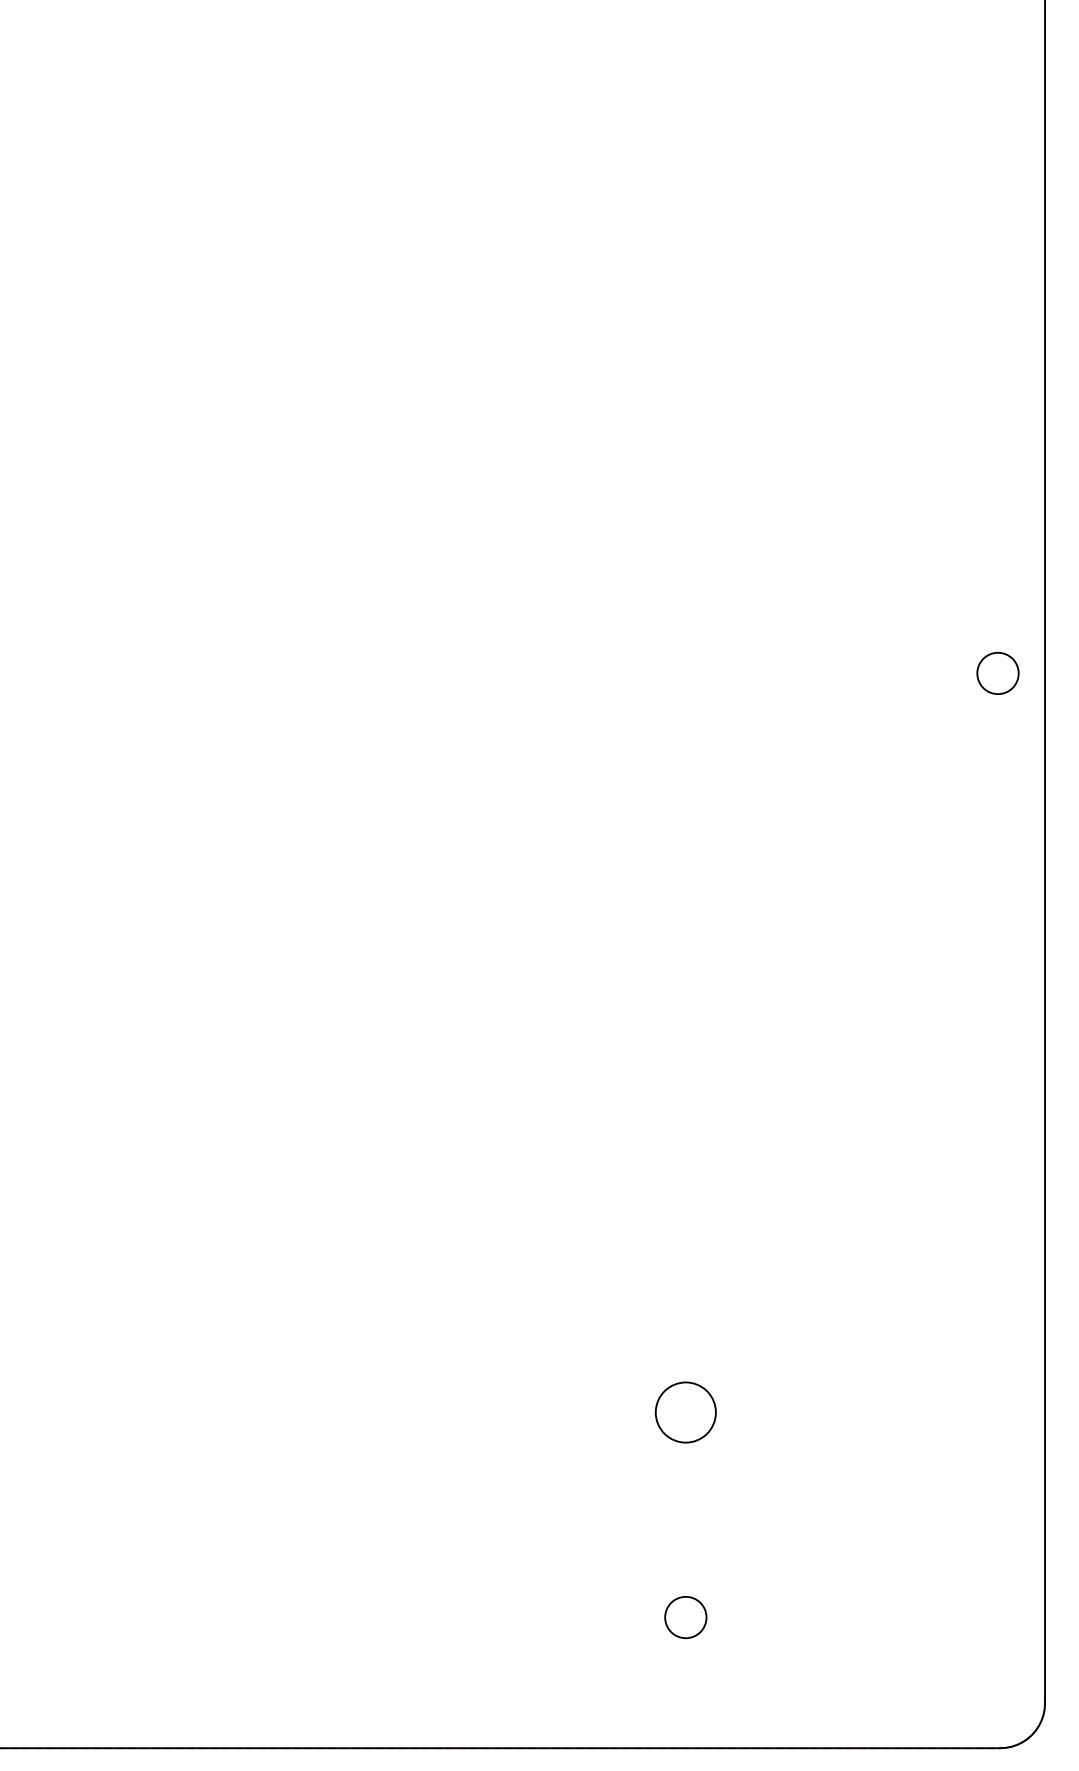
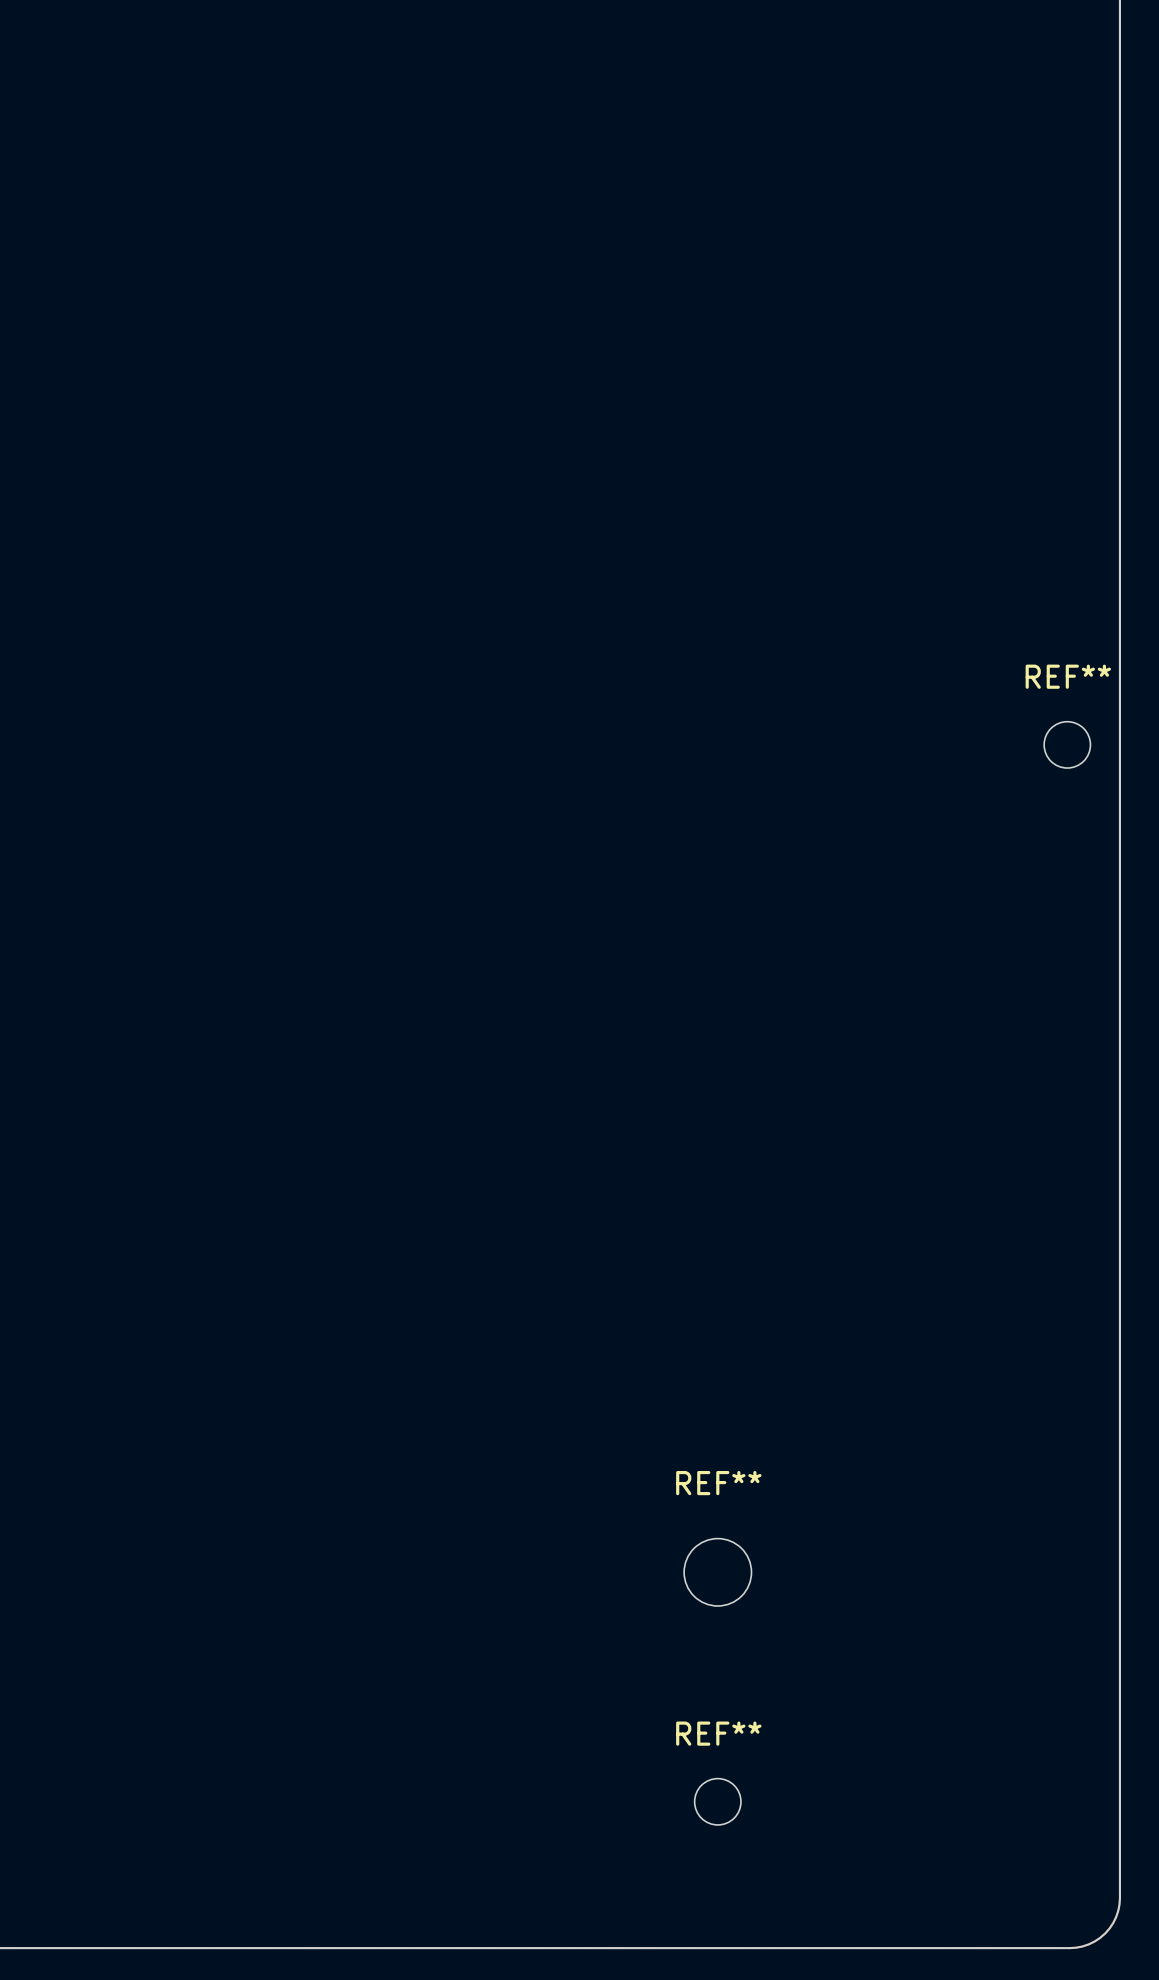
REF** name: none -> REF** (1068, 676)
REF** name: none -> REF** (718, 1483)
REF** name: none -> REF** (718, 1733)

